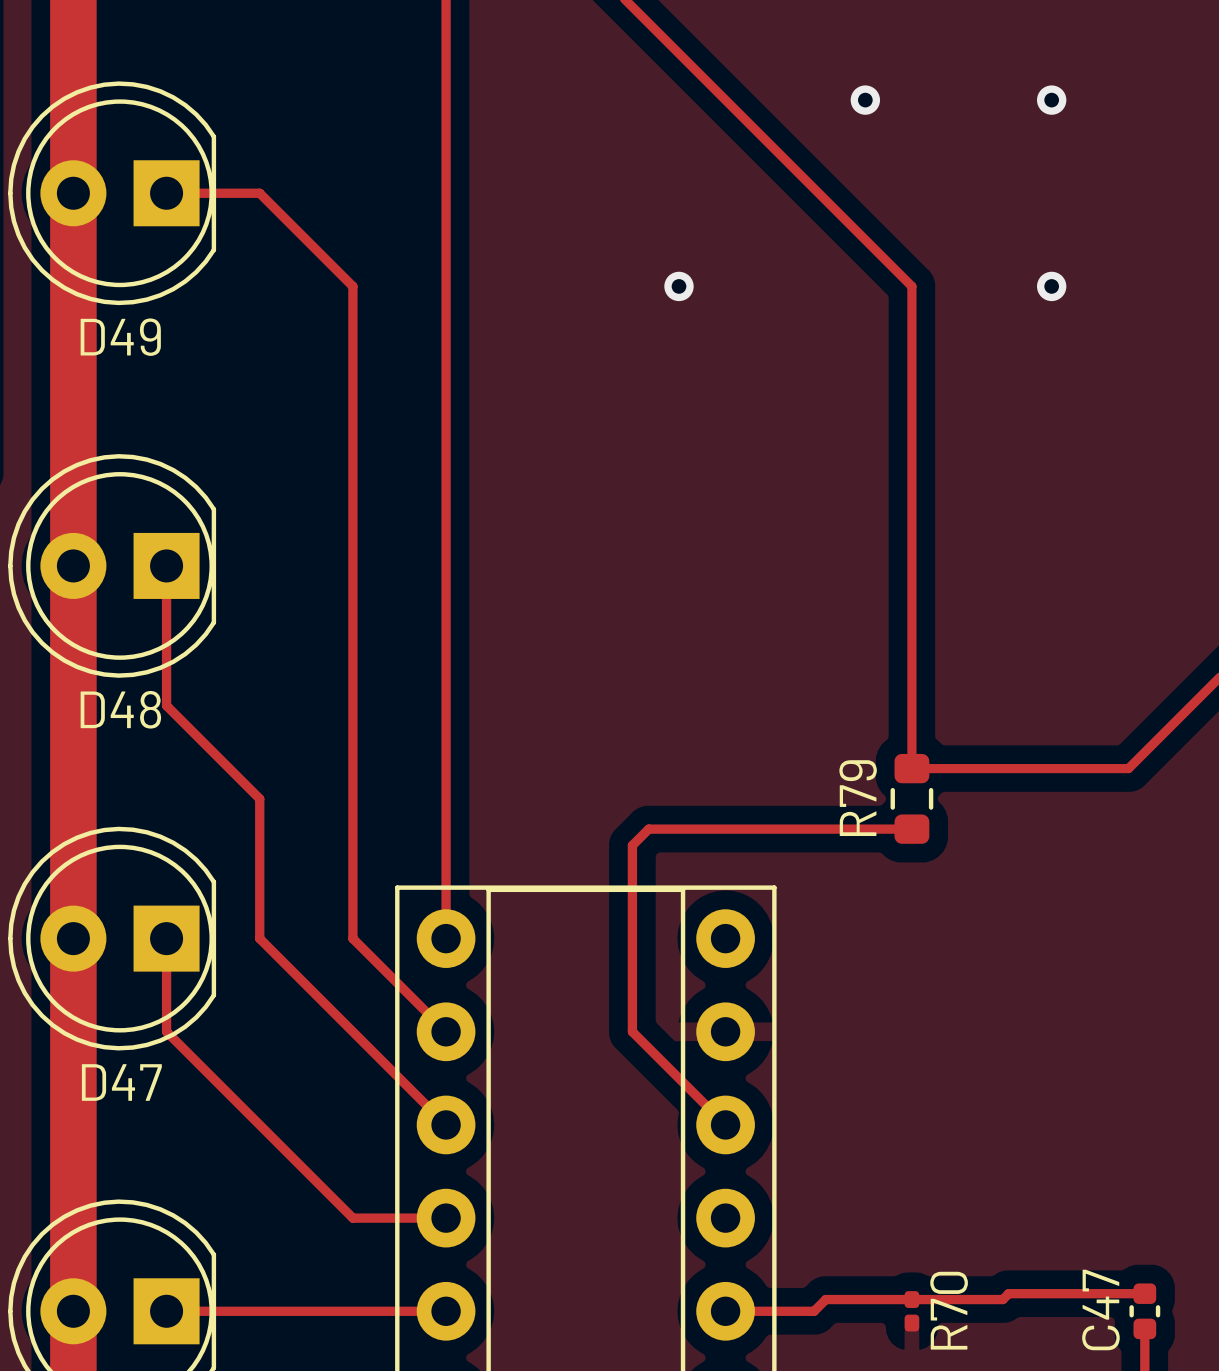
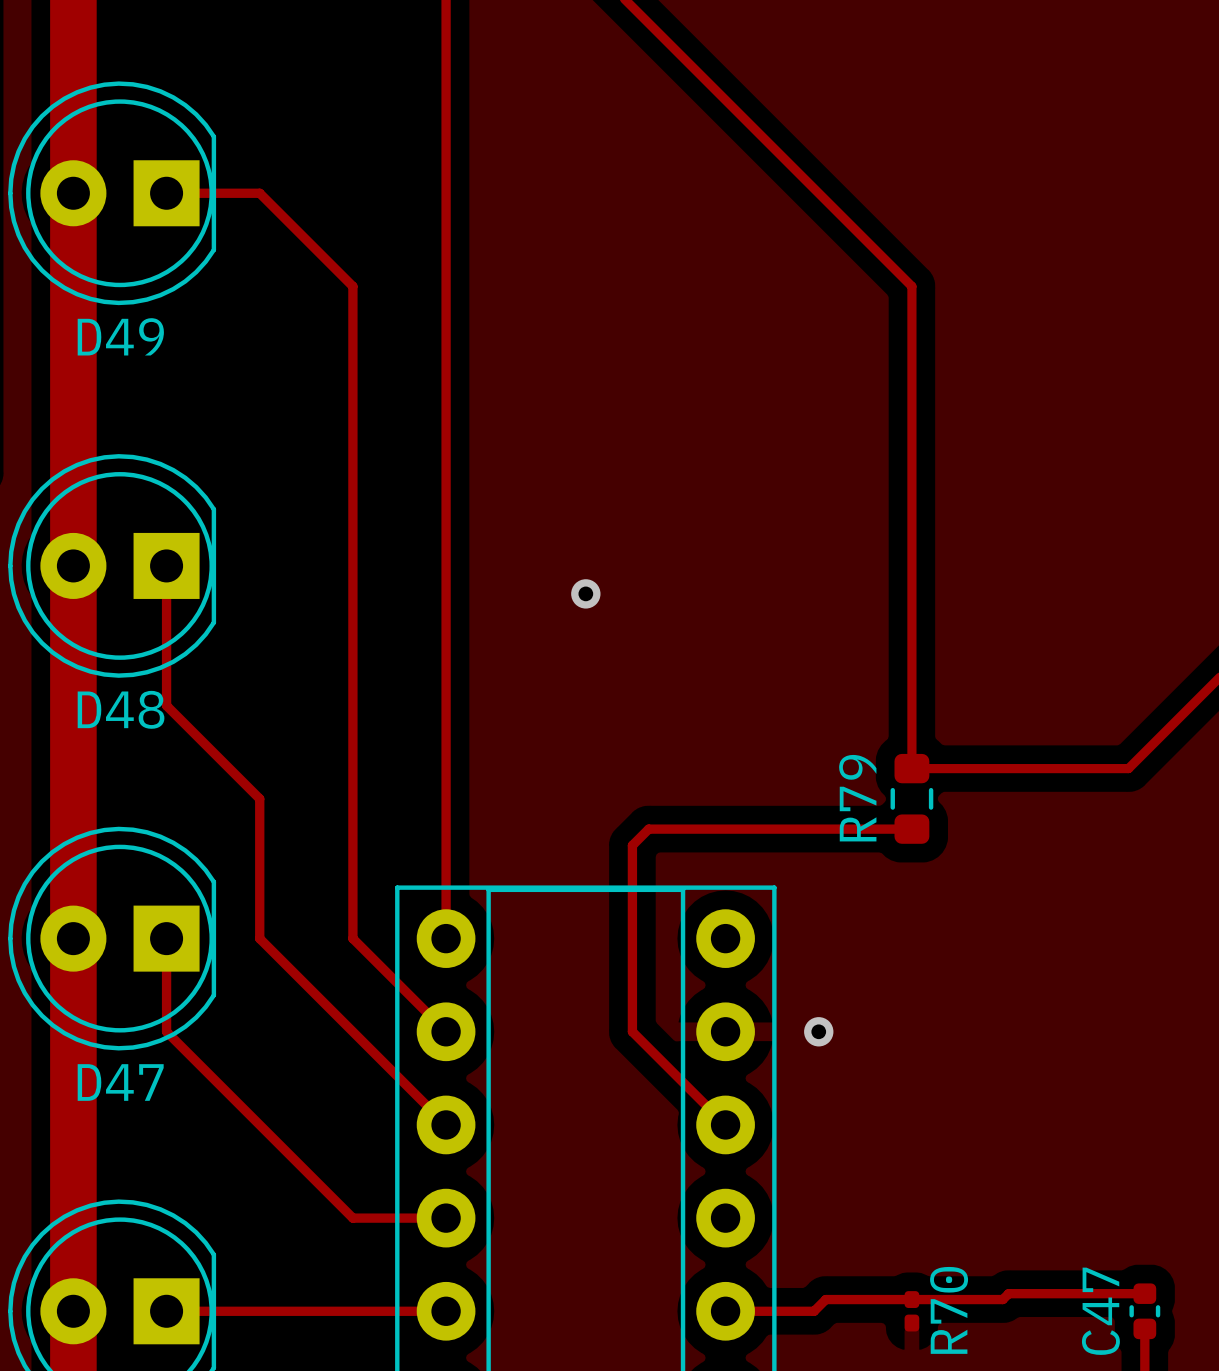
via: (865, 100) -> none
via: (1051, 100) -> none
via: (679, 286) -> none
via: (1051, 286) -> none
via: none -> (585, 593)
via: none -> (818, 1031)

